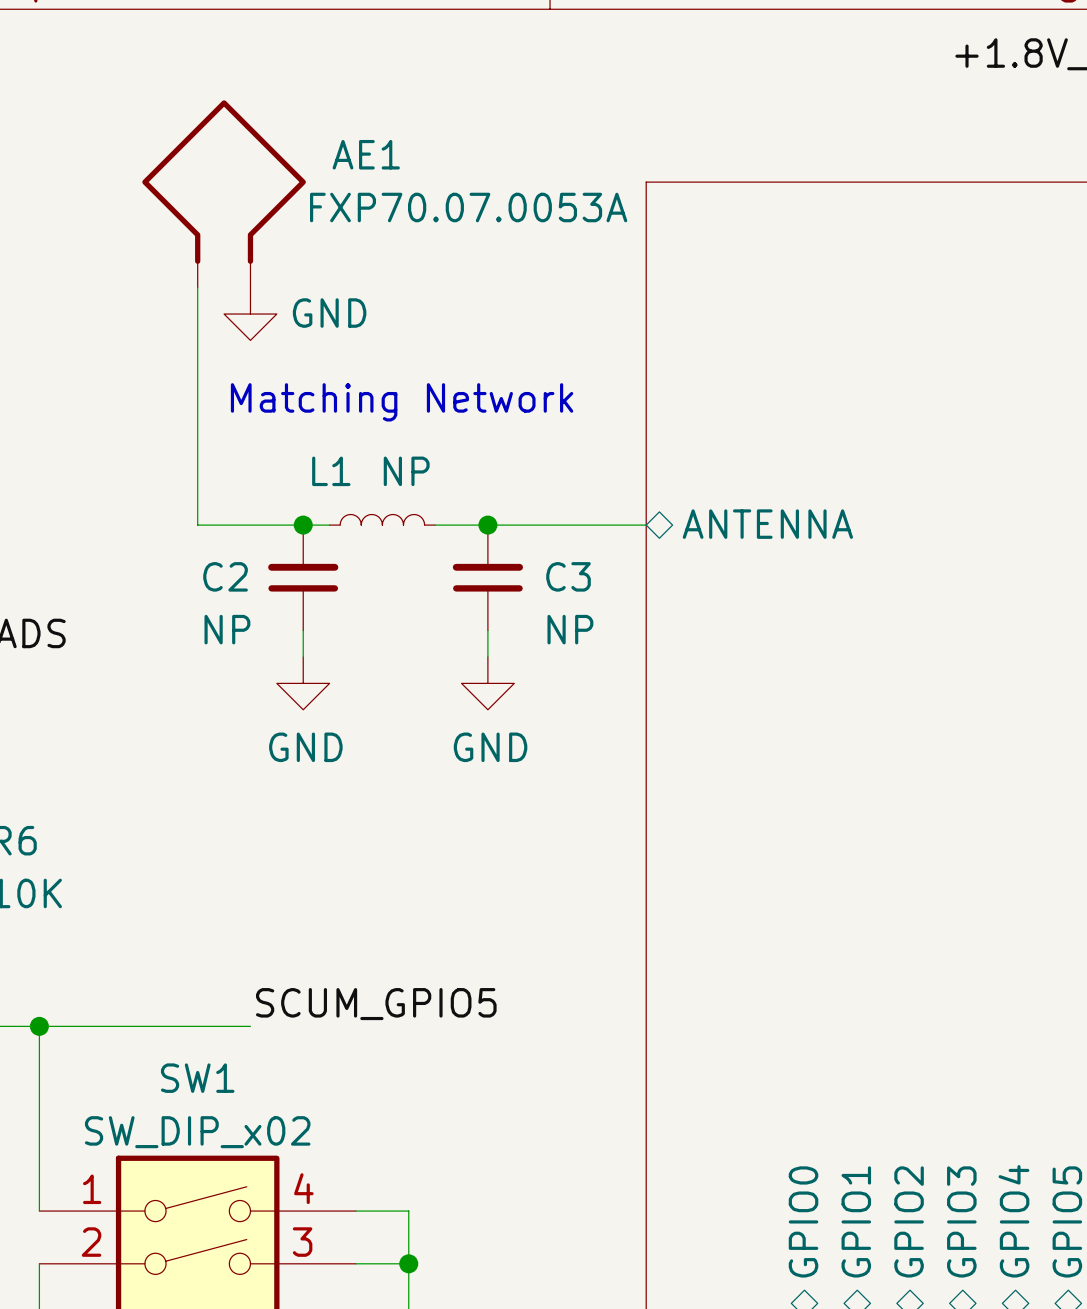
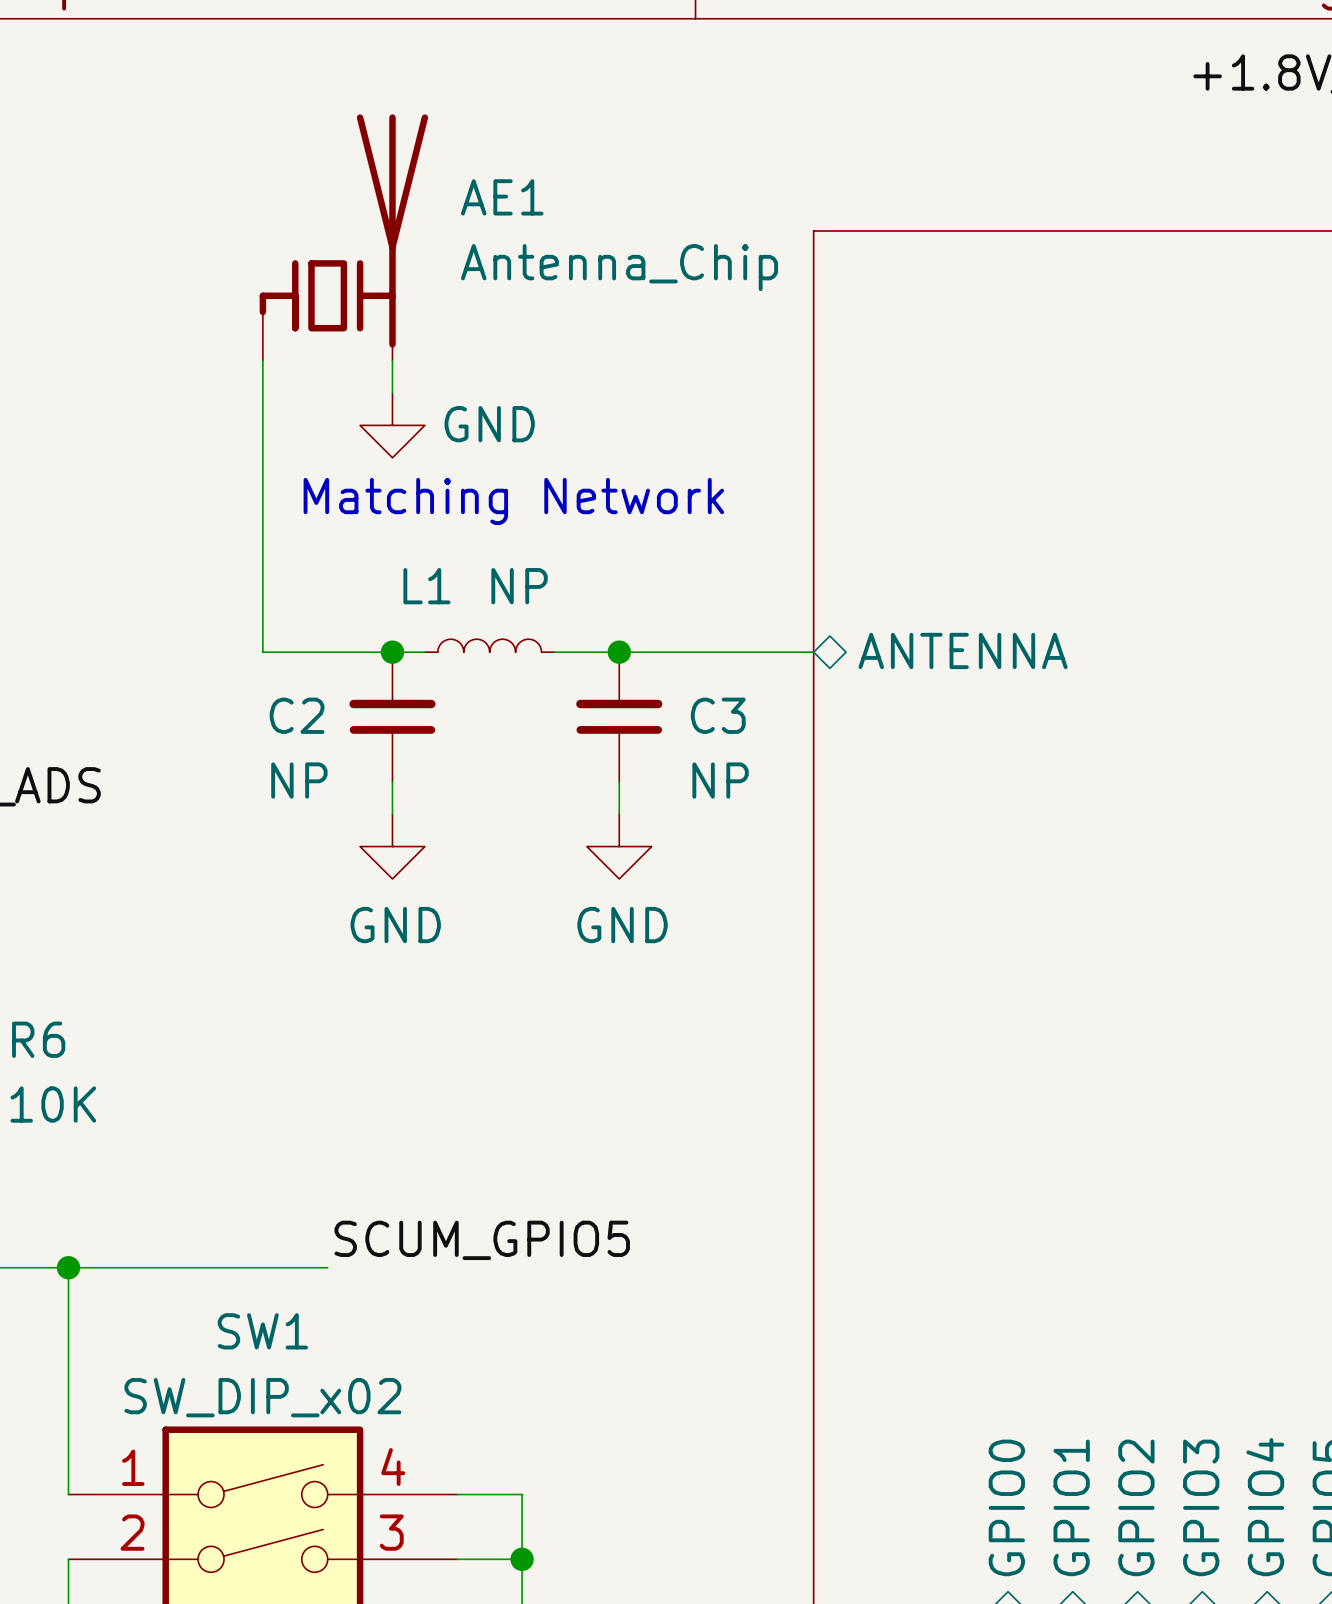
AE1 symbol: [142, 100, 306, 288] -> [259, 114, 429, 361]
AE1 value: FXP70.07.0053A (468, 207) -> Antenna_Chip (619, 267)
wire: none -> (392, 360) (392, 392)
power symbol position: GND (250, 314) -> GND (392, 425)

